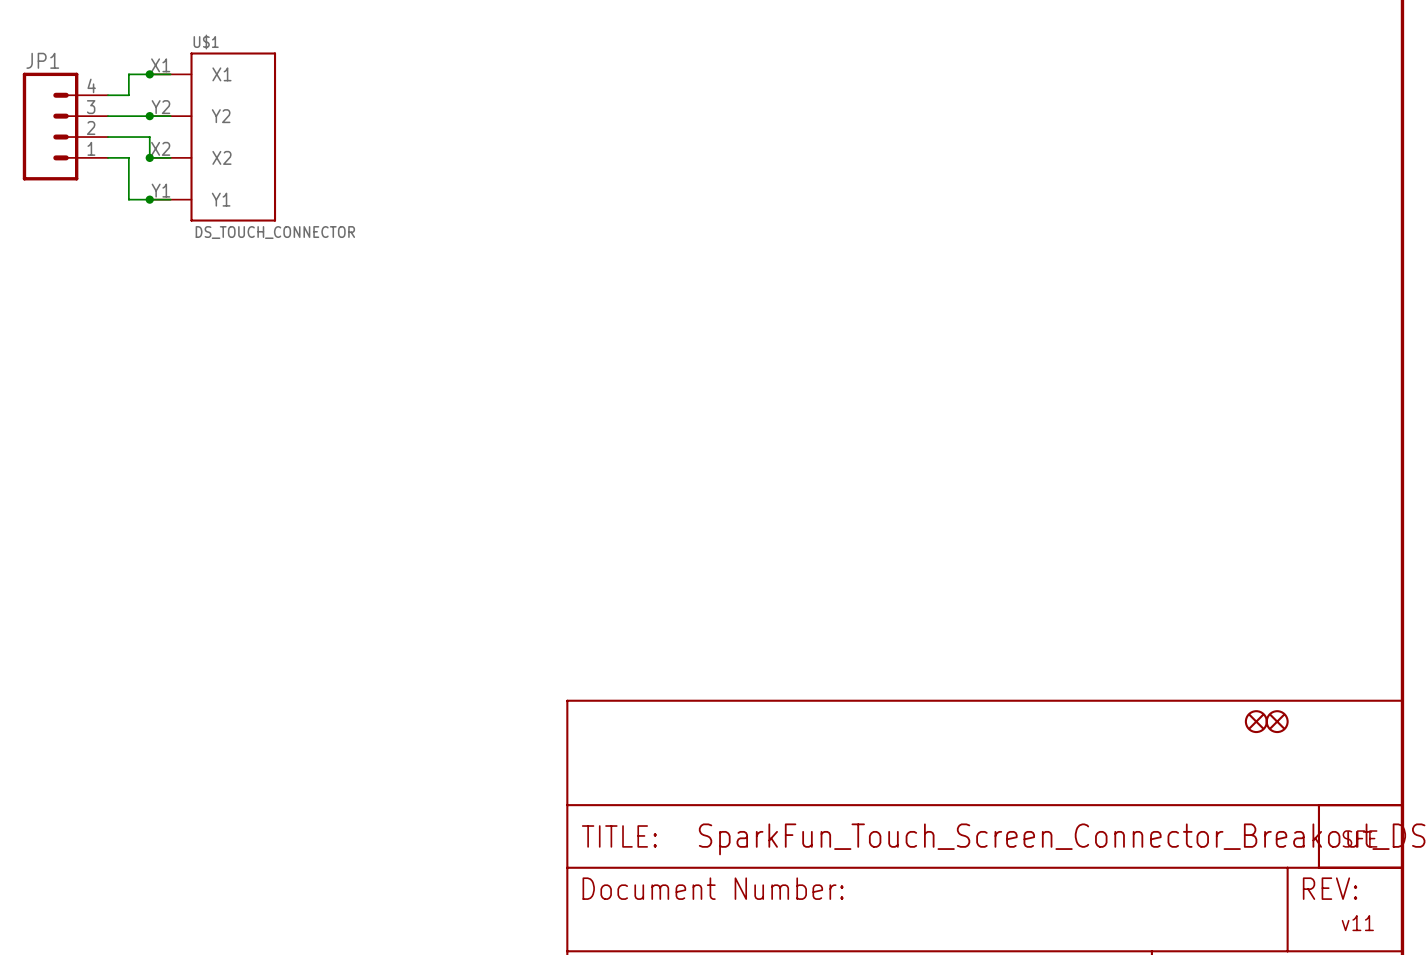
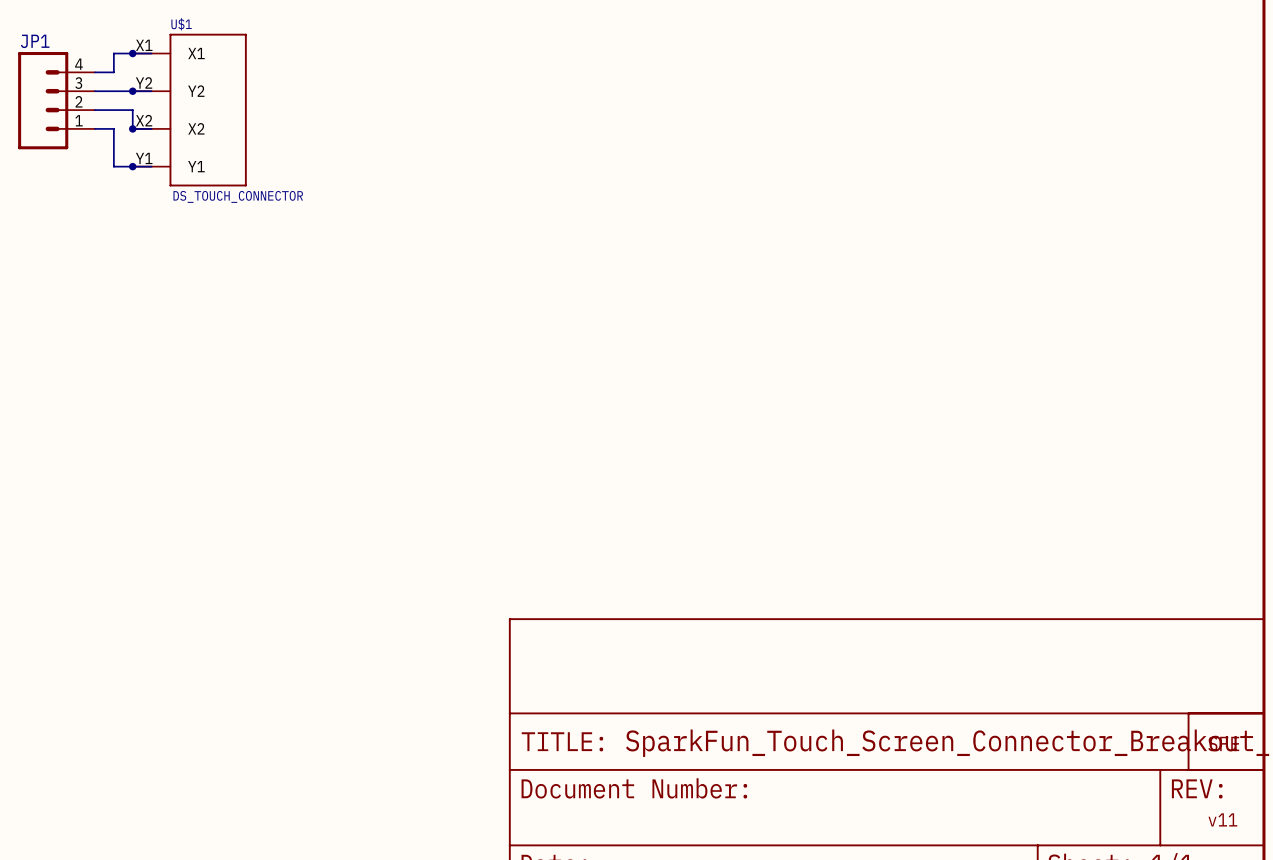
part: (1256, 721) -> none
part: (1277, 721) -> none

